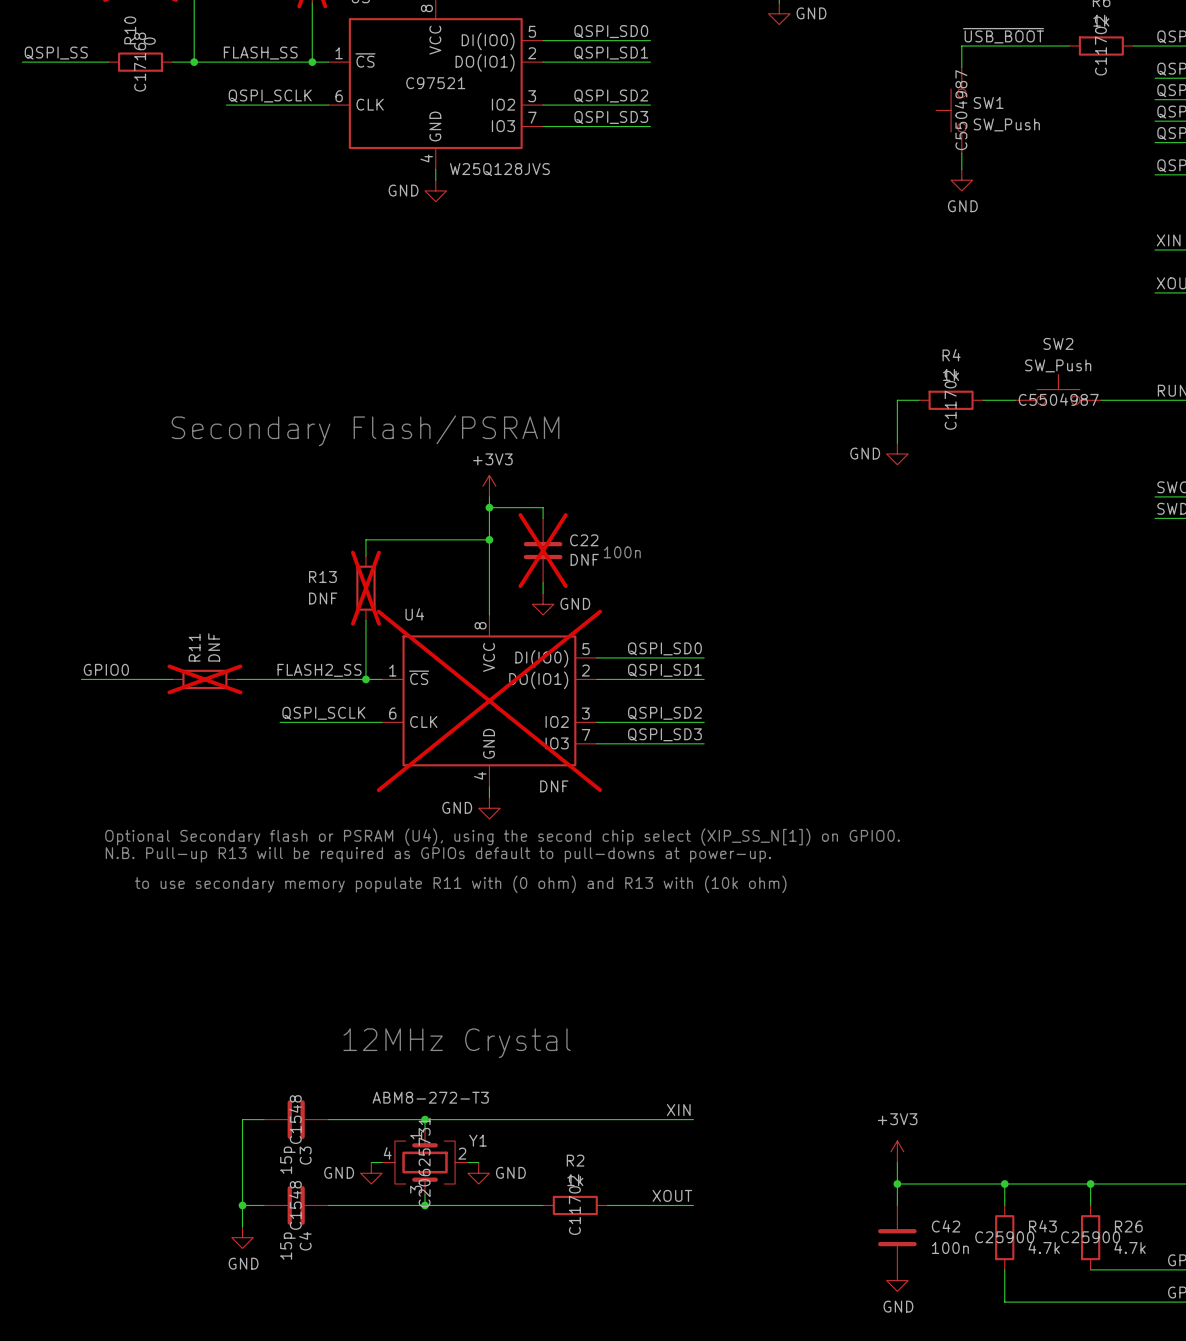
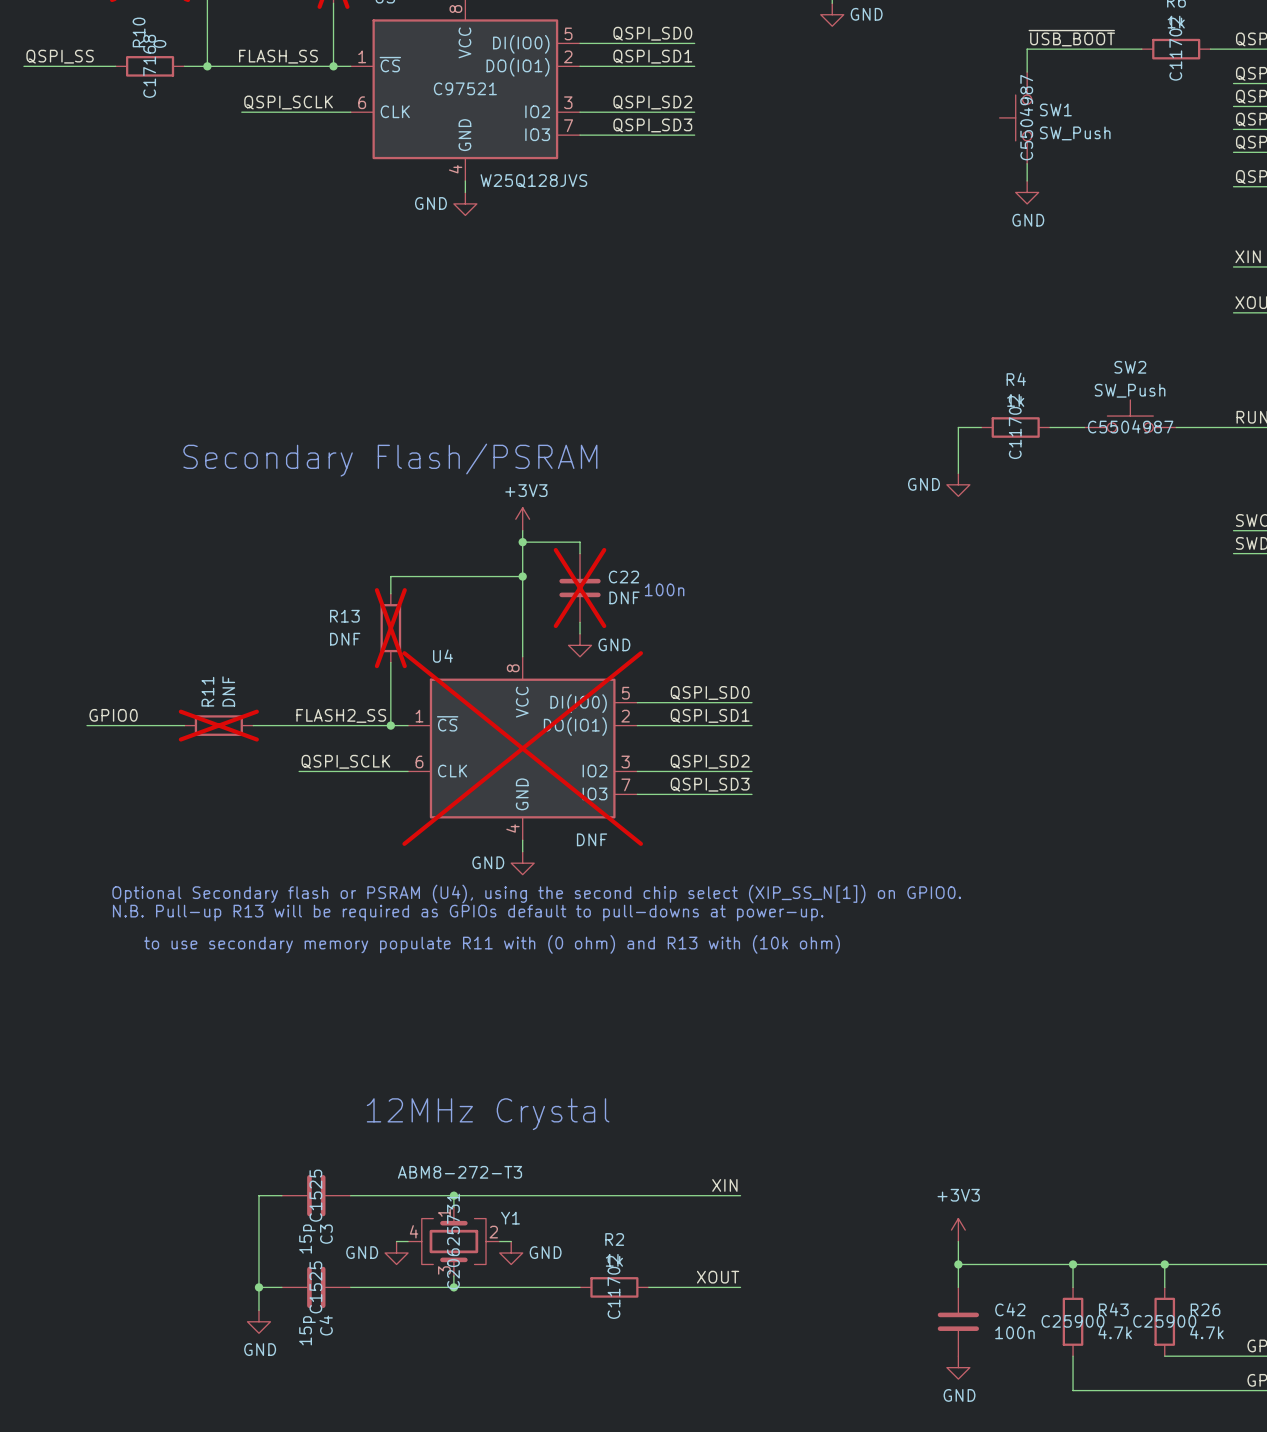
C3 text: C1548 (295, 1119) -> C1525 (315, 1195)
C4 text: C1548 (295, 1205) -> C1525 (315, 1287)

